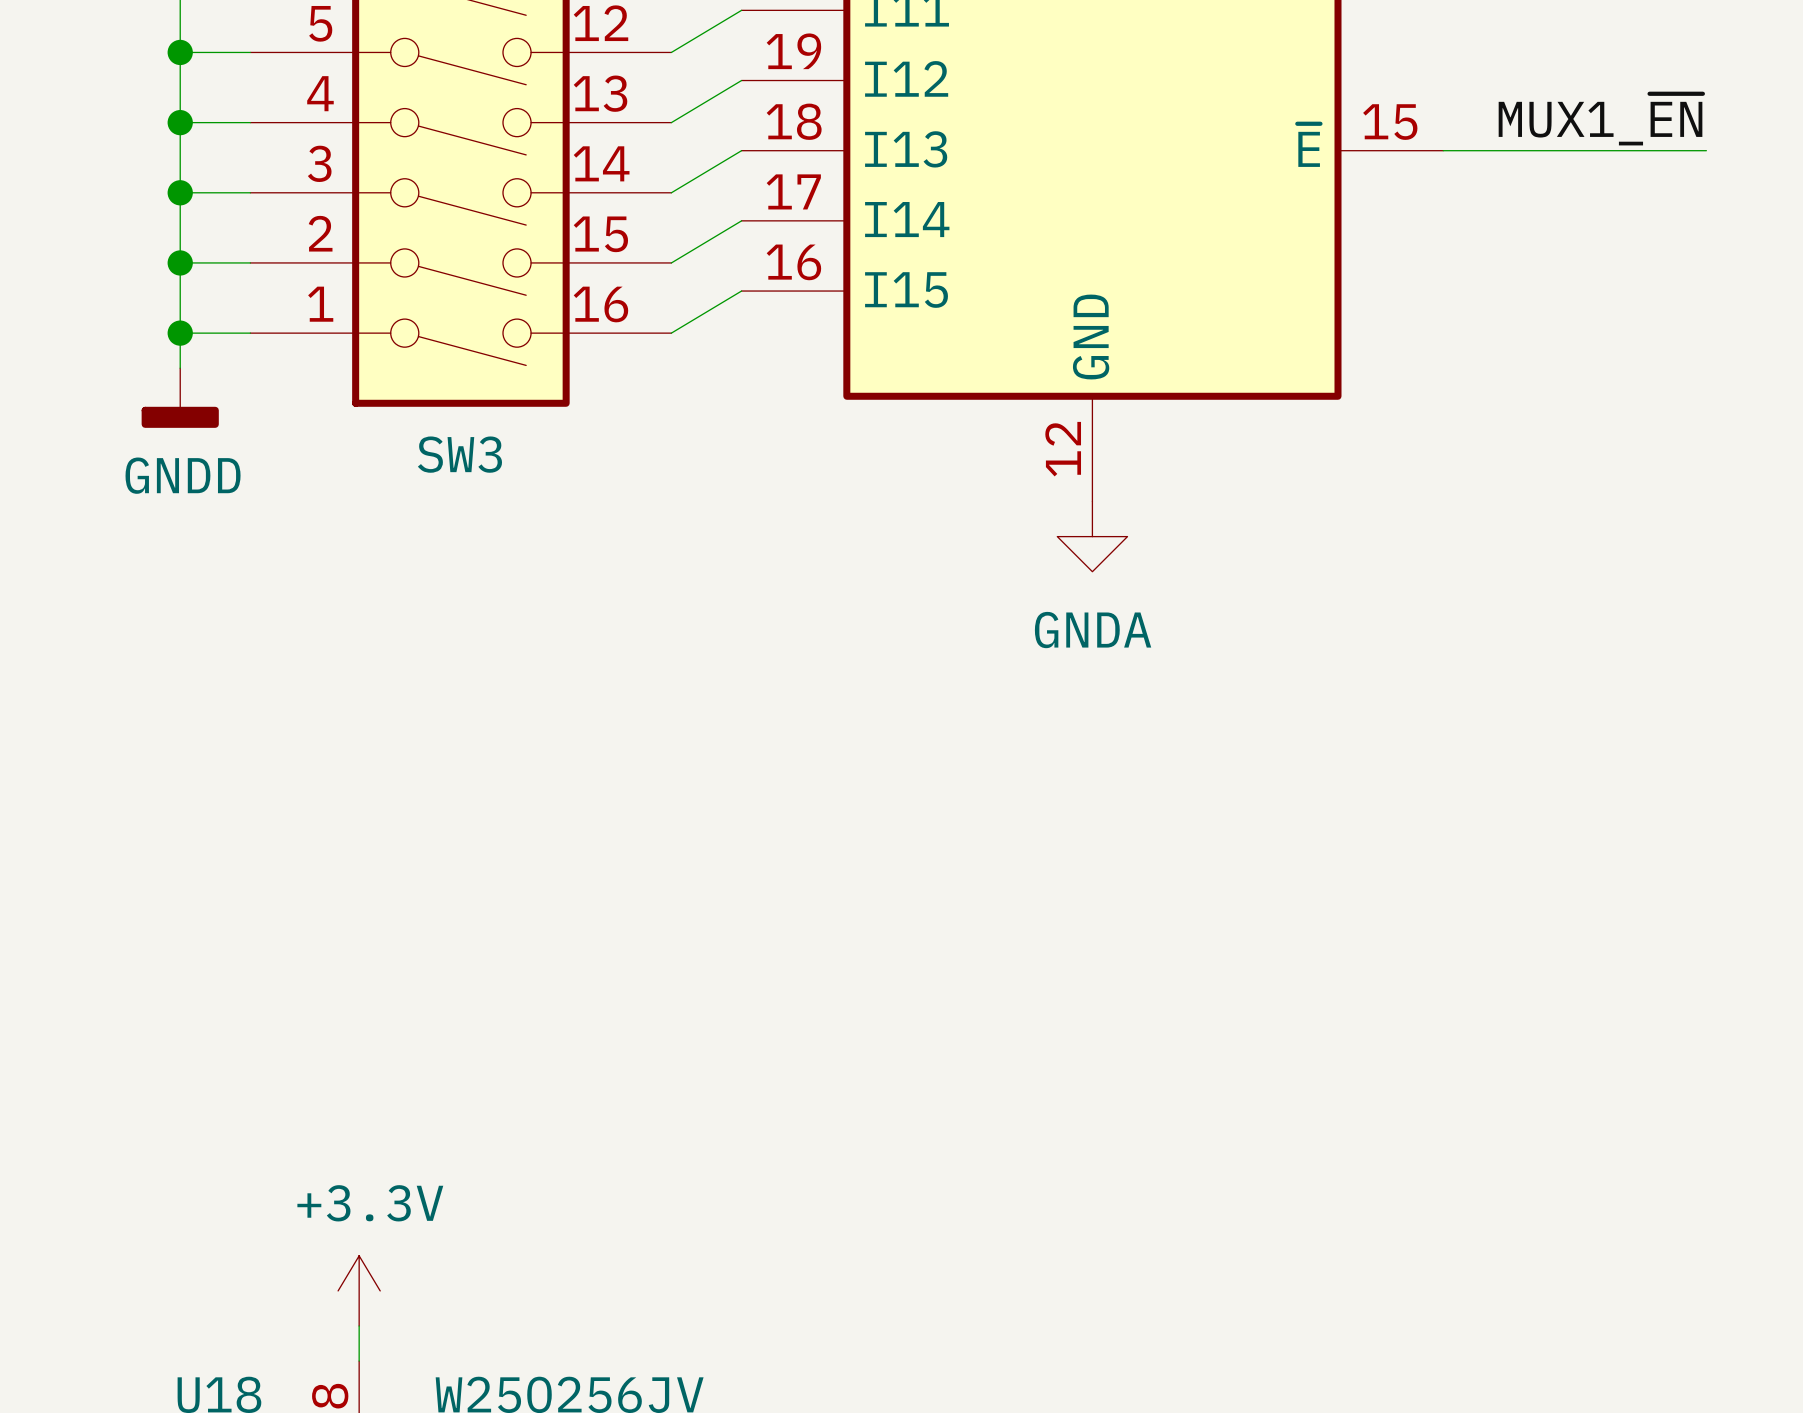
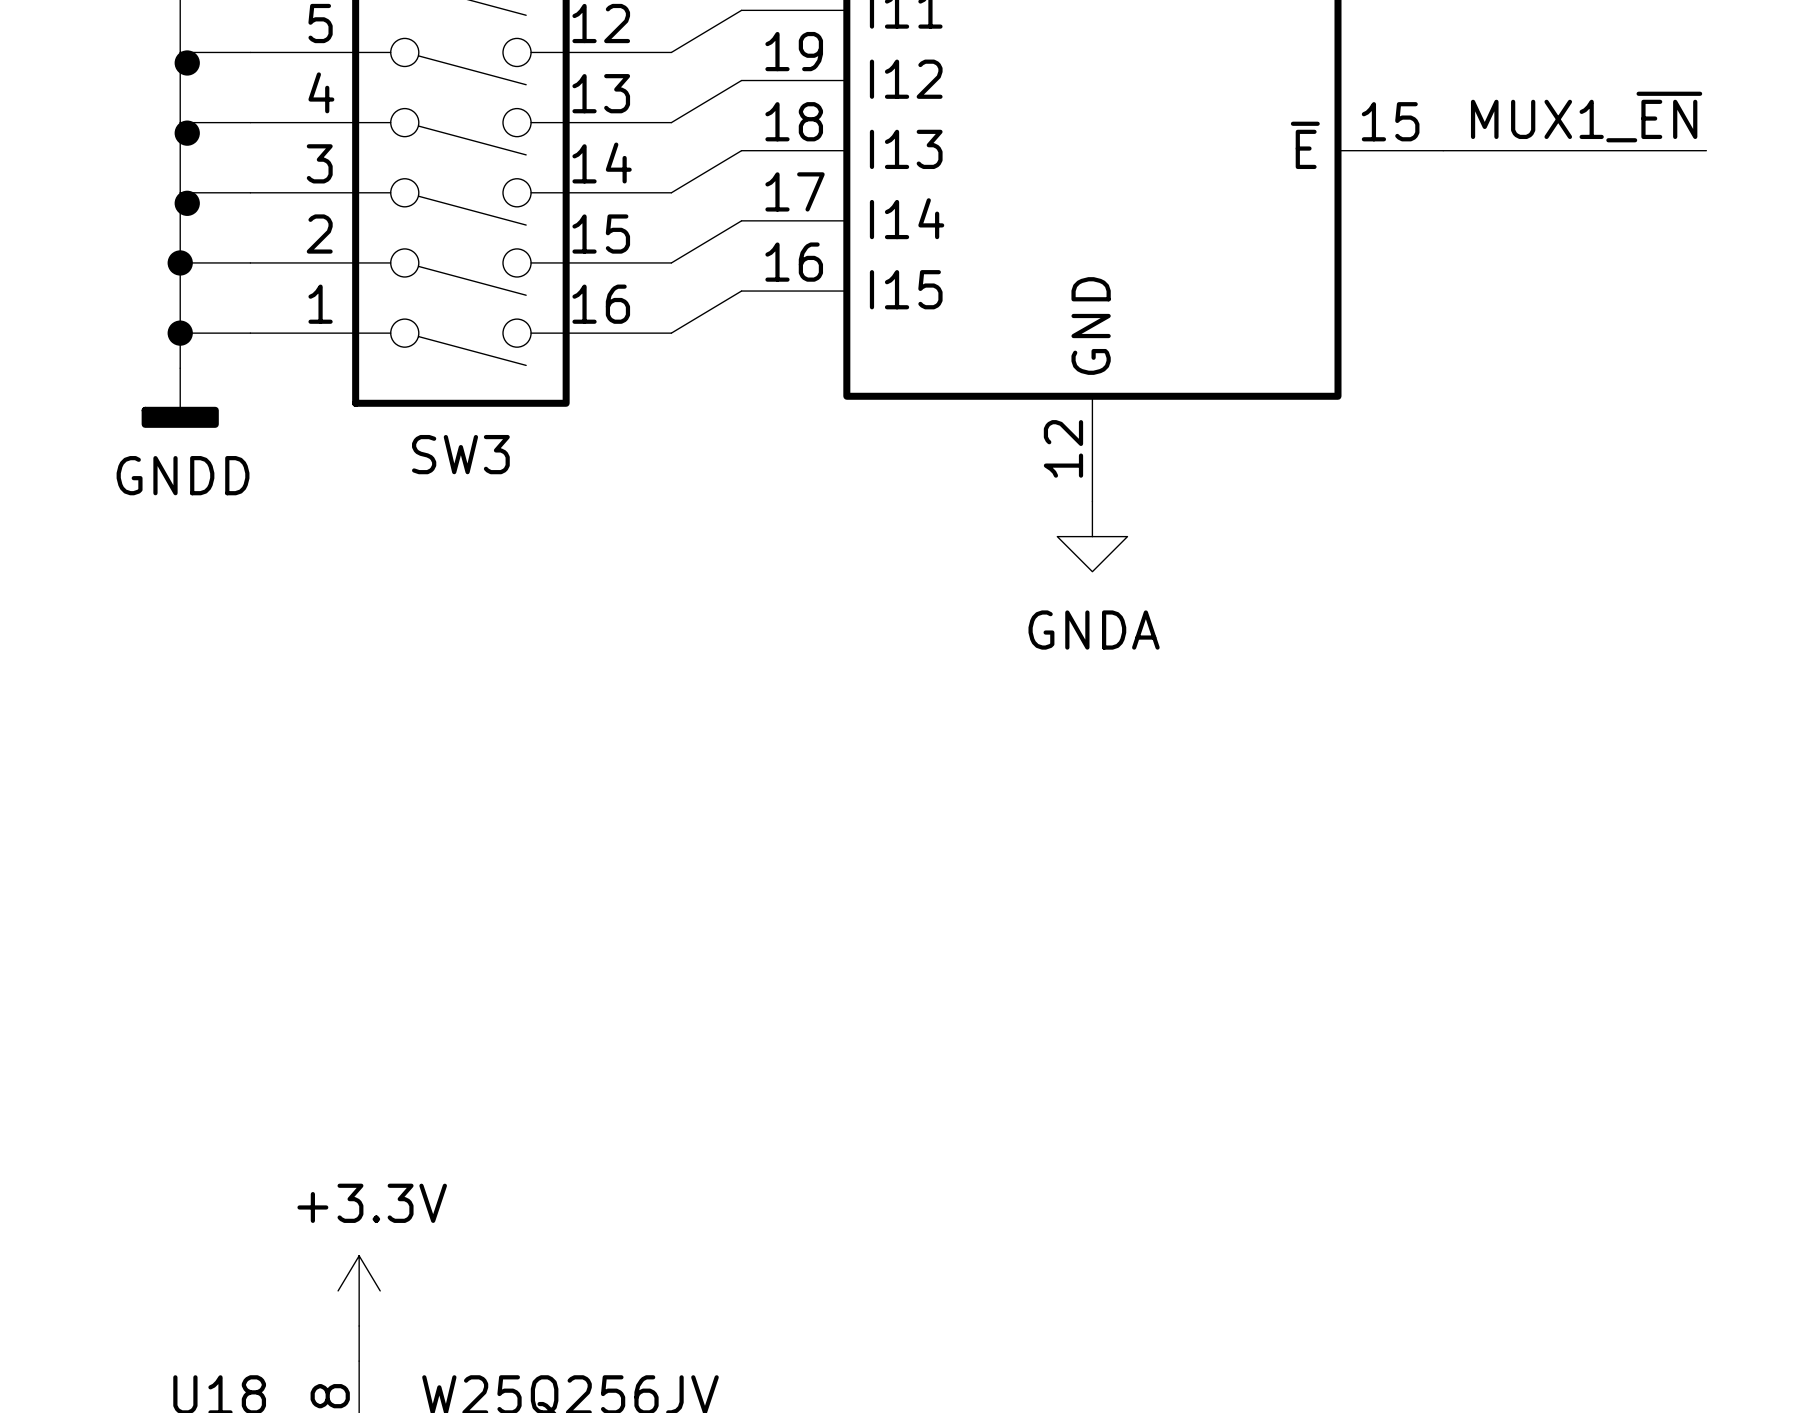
junction position: (180, 52) -> (187, 62)
junction position: (180, 122) -> (187, 133)
junction position: (180, 192) -> (187, 203)

